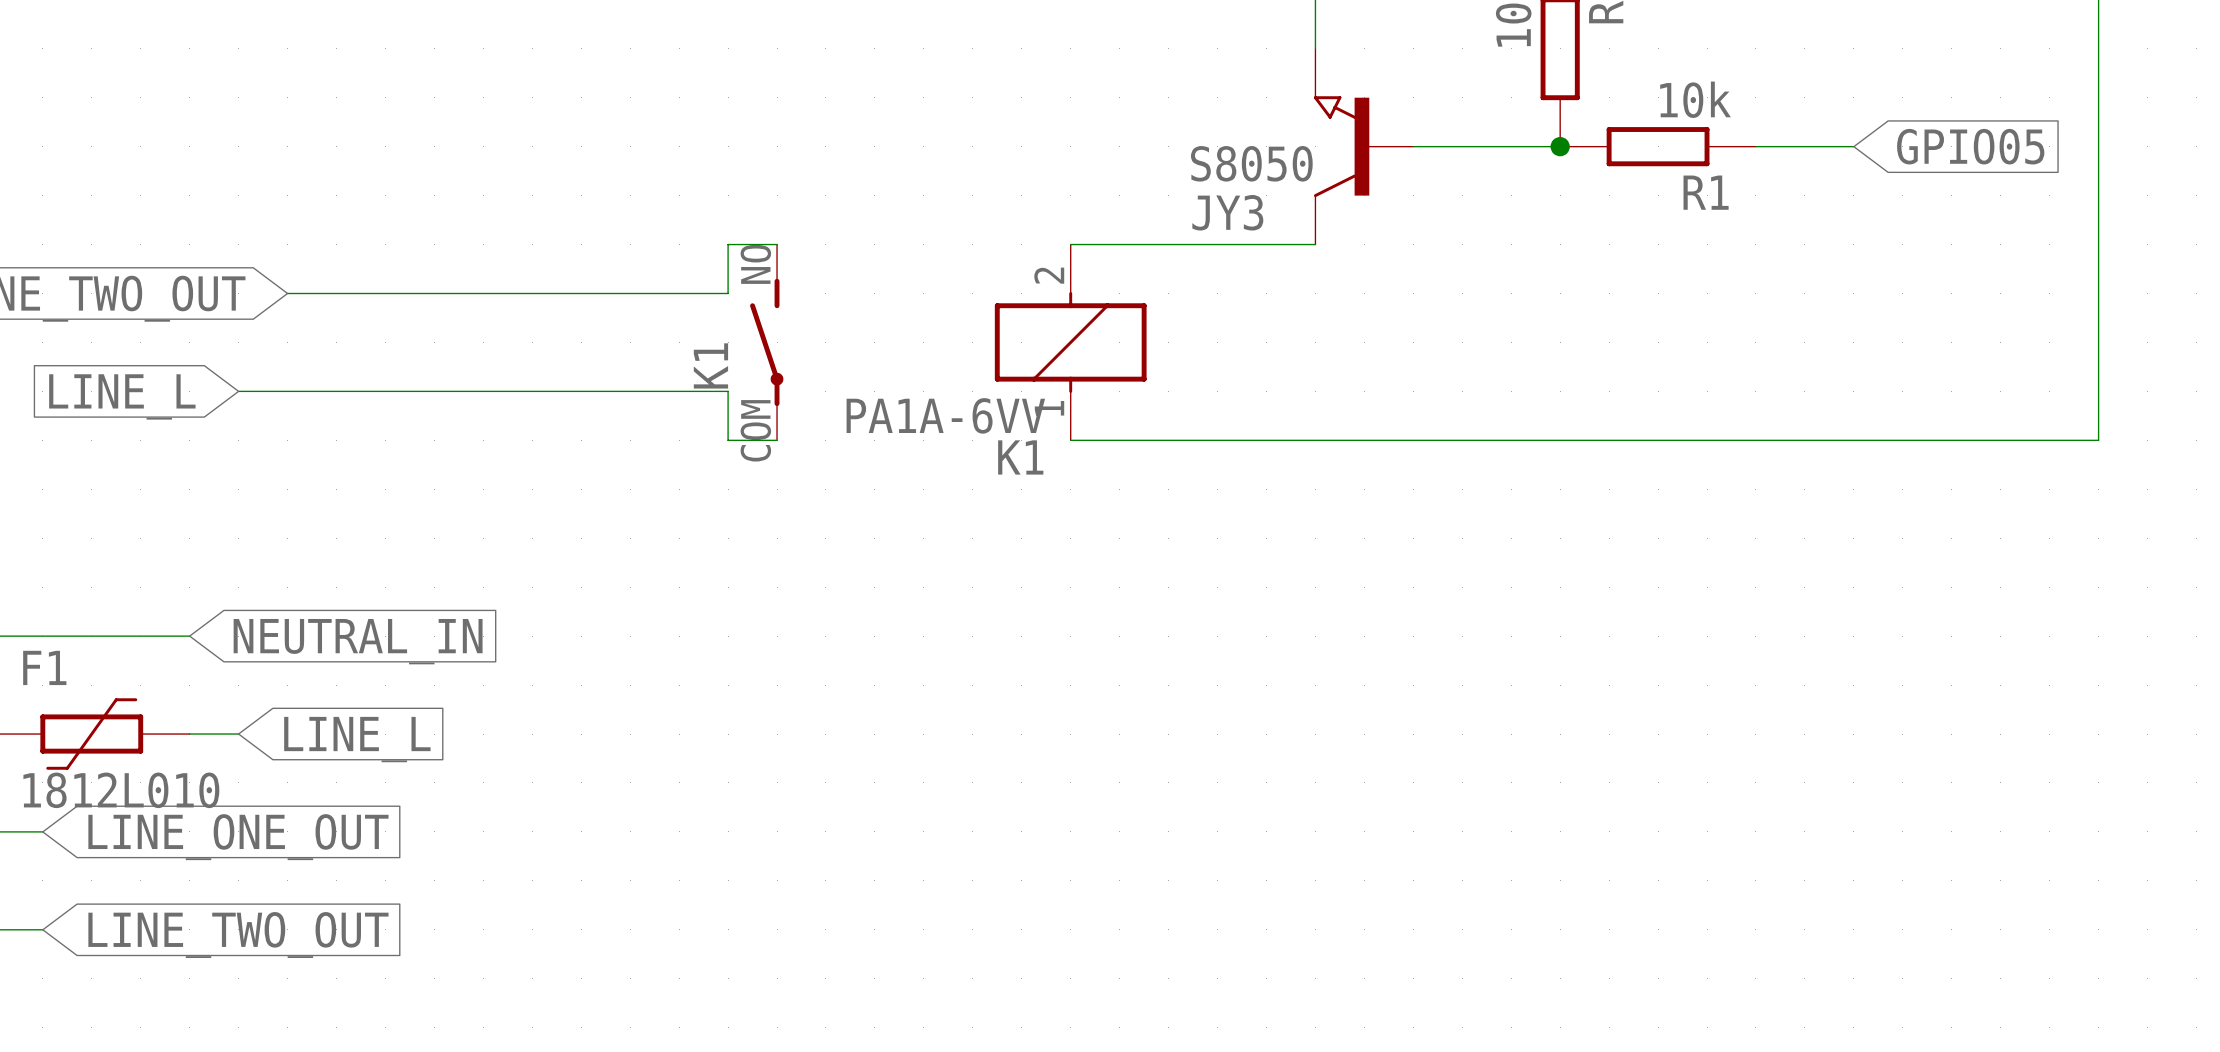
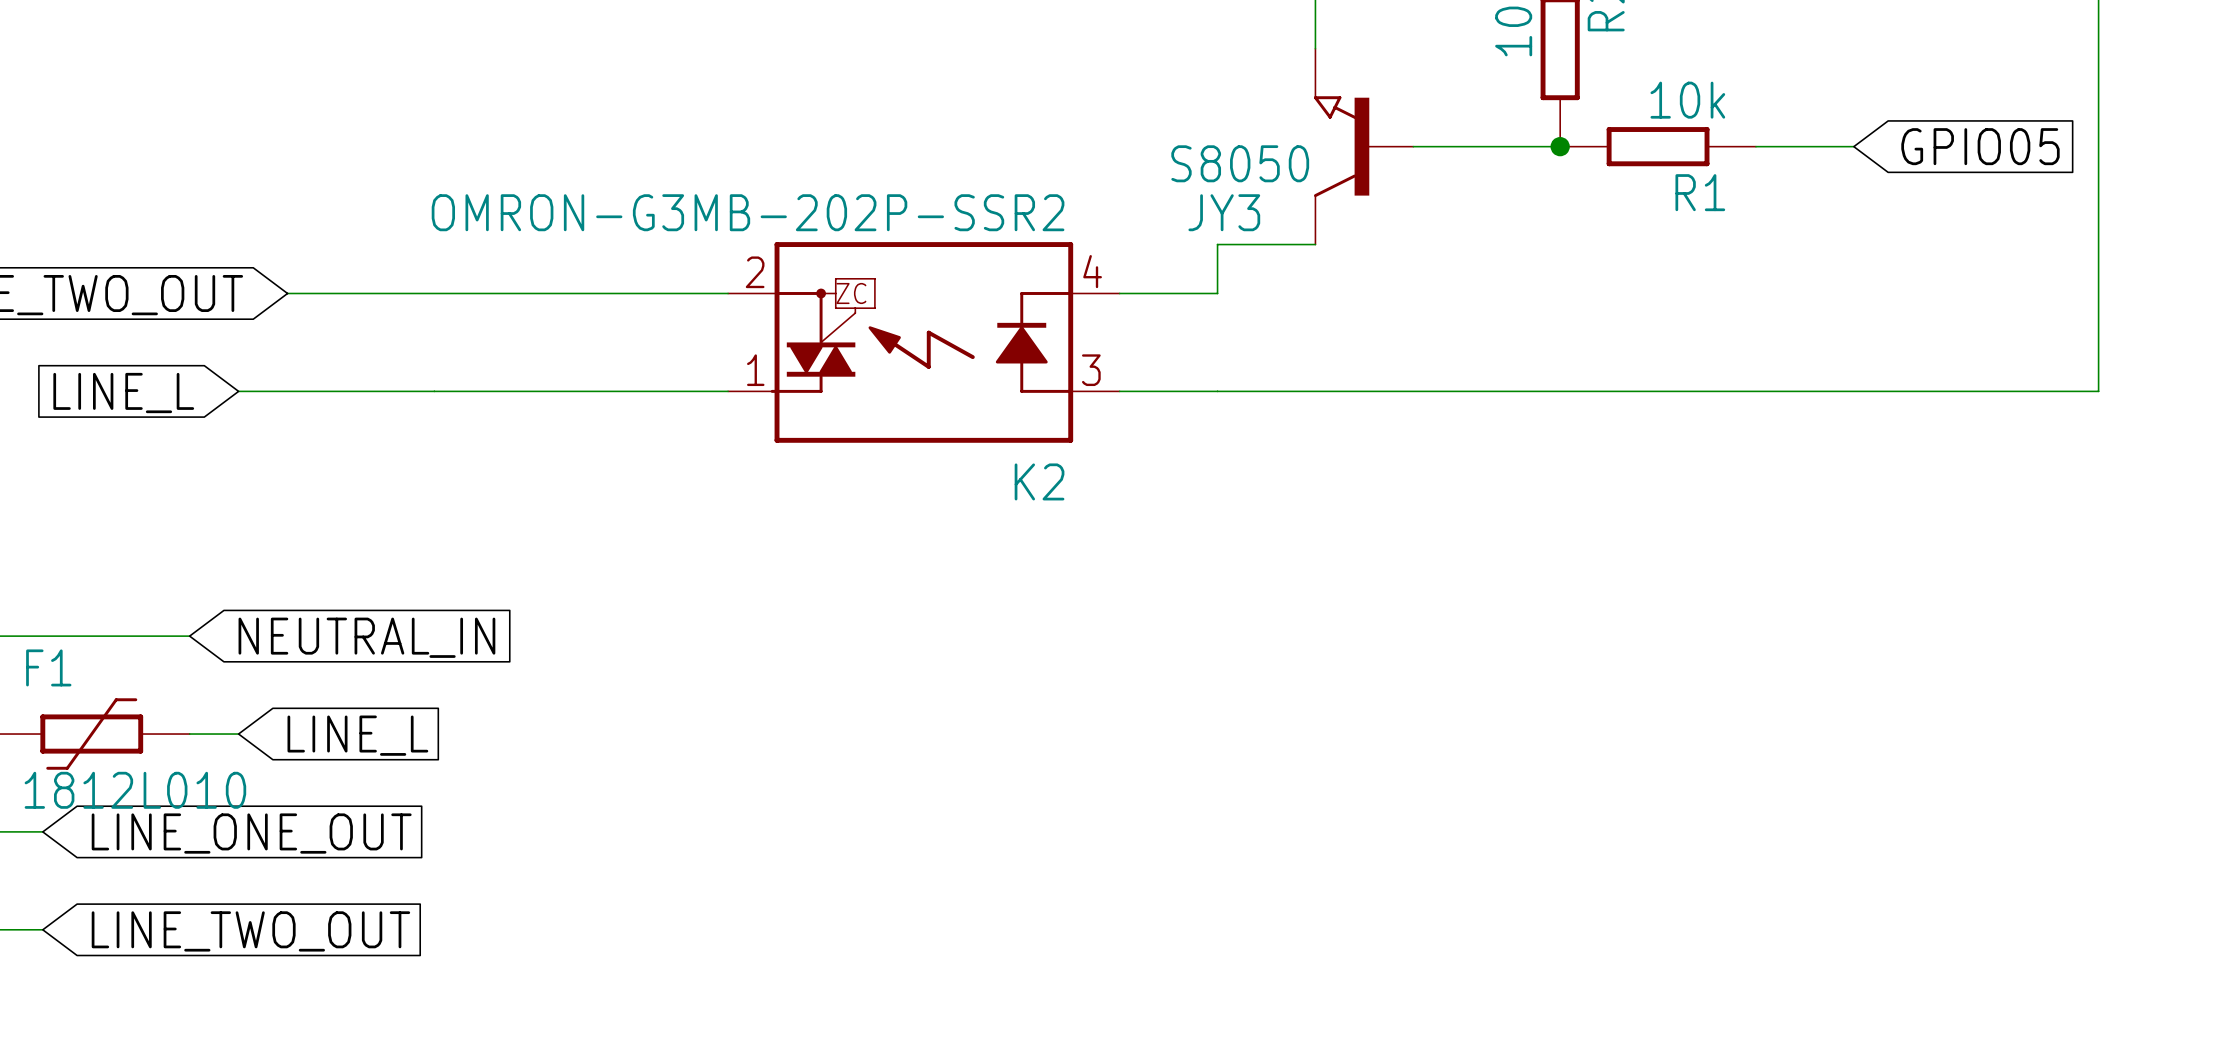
wire: (777, 244) (728, 244) (728, 293) -> none
wire: (1070, 244) (1217, 244) -> (1119, 293) (1217, 293) (1217, 244)
K1: (766, 342) -> none
K2: none -> OMRON-G3MB-202P-SSR2 (923, 342)
K1: PA1A-6VV (1070, 342) -> none
wire: (728, 391) (728, 440) (777, 440) -> none
wire: (2098, 391) (2098, 440) (1070, 440) -> (2098, 391) (1119, 391)

